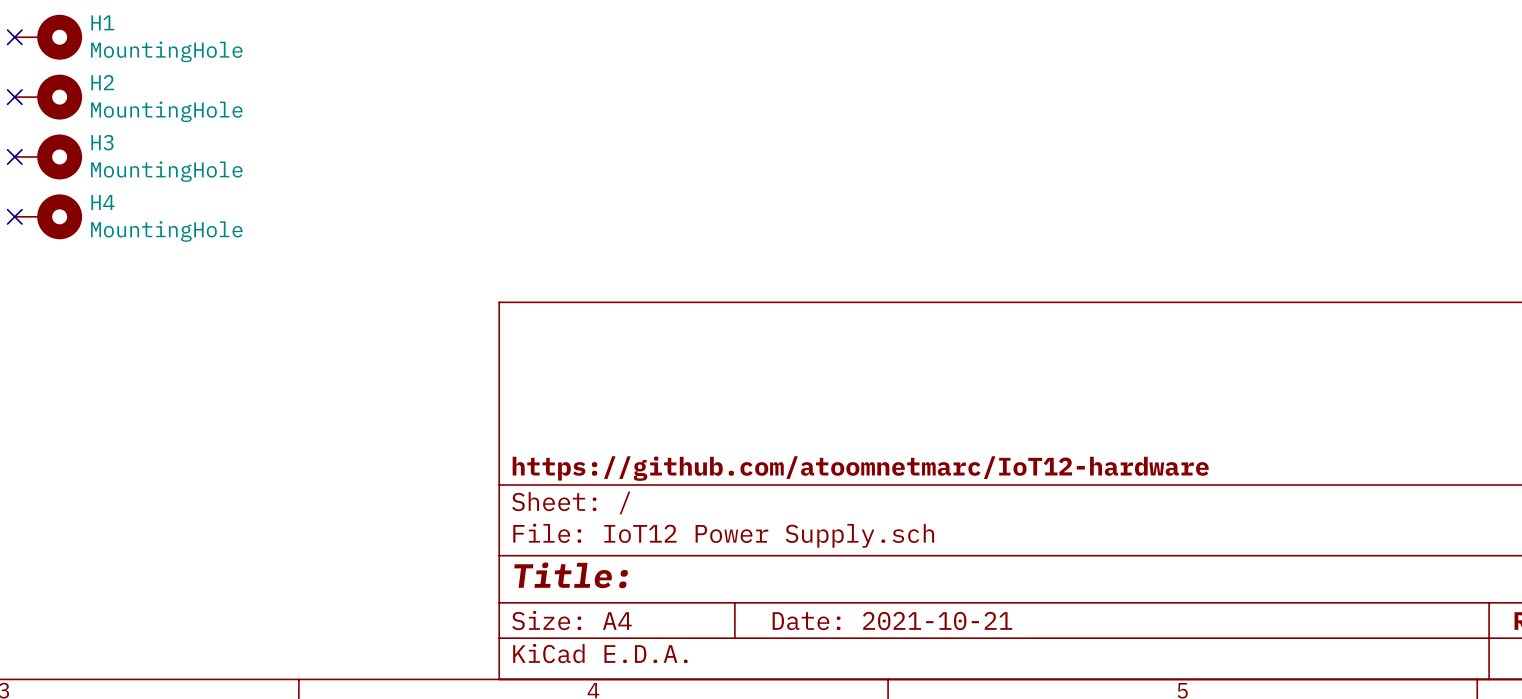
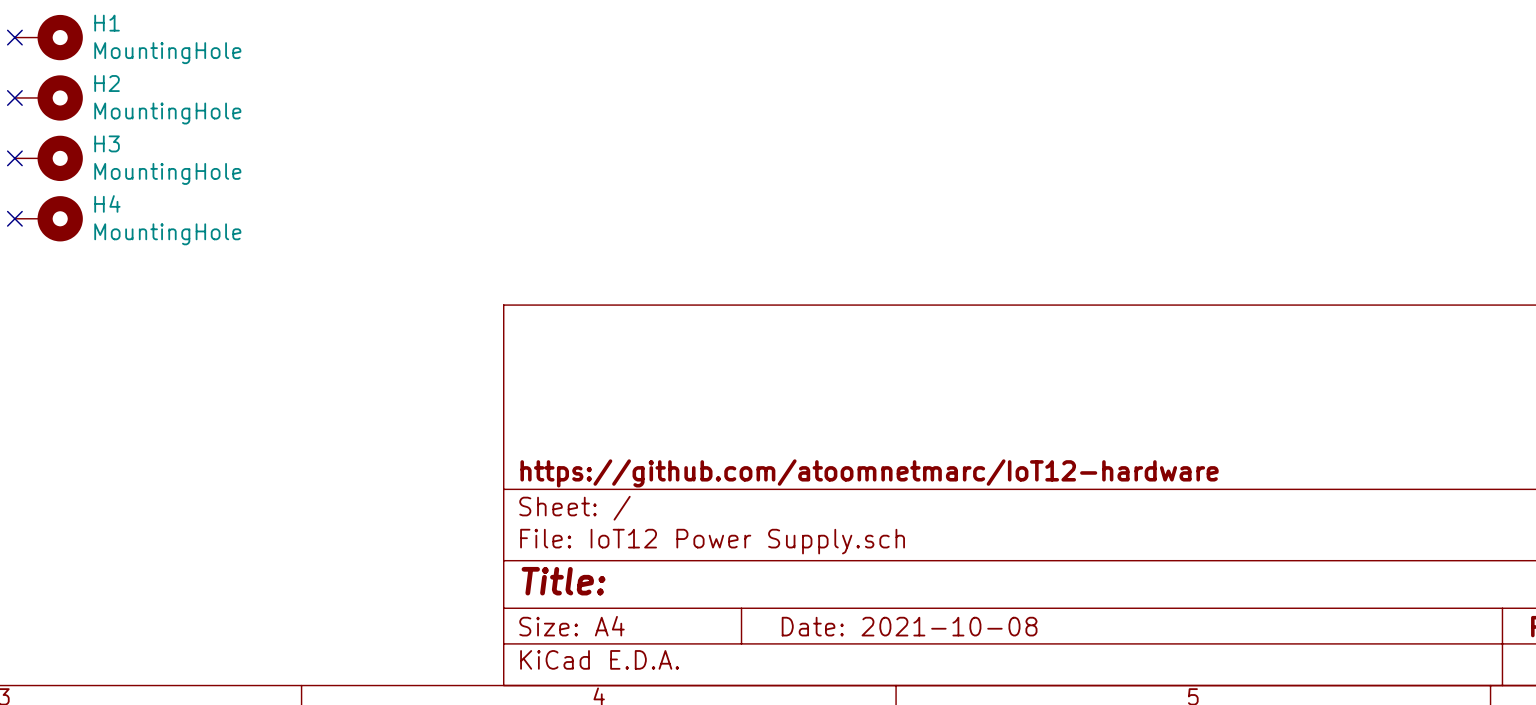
title block: Date: 2021-10-21 (892, 621) -> Date: 2021-10-08 (909, 626)

